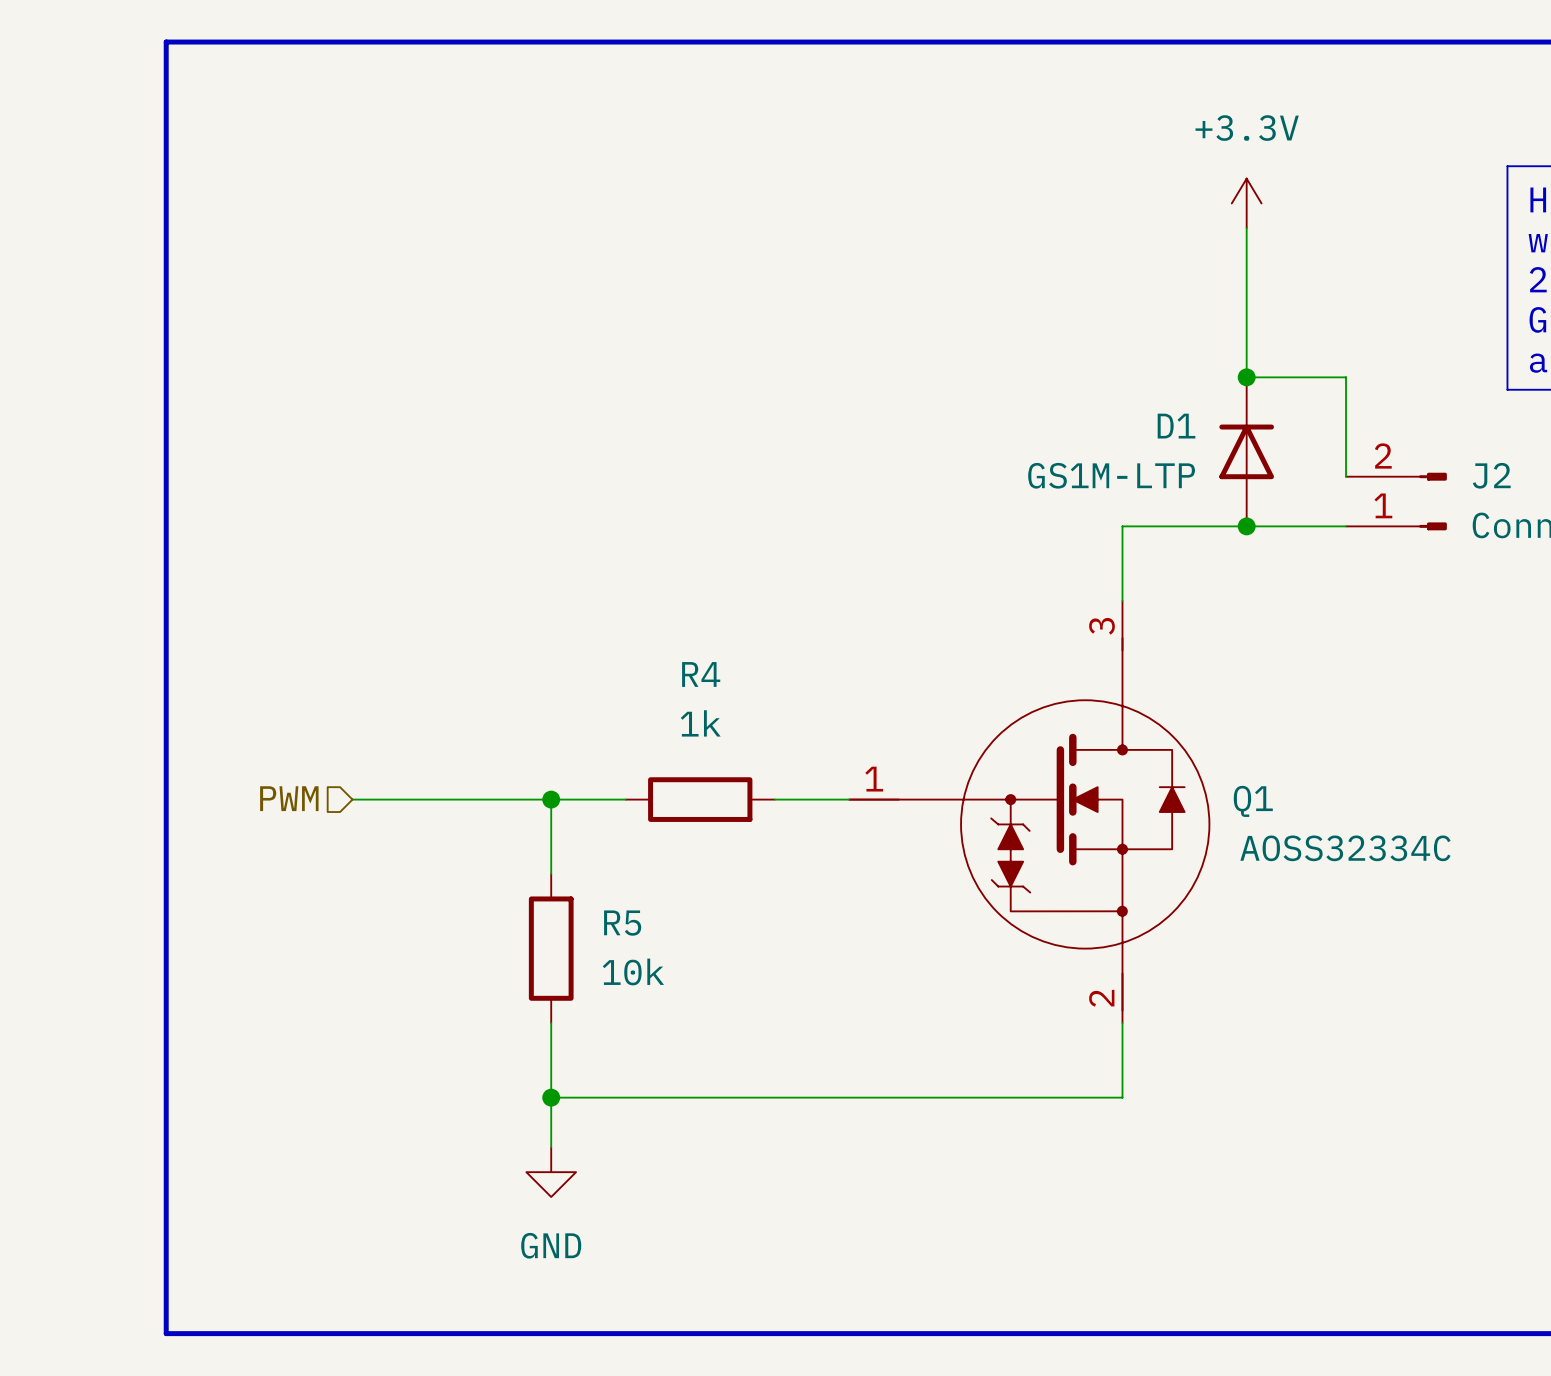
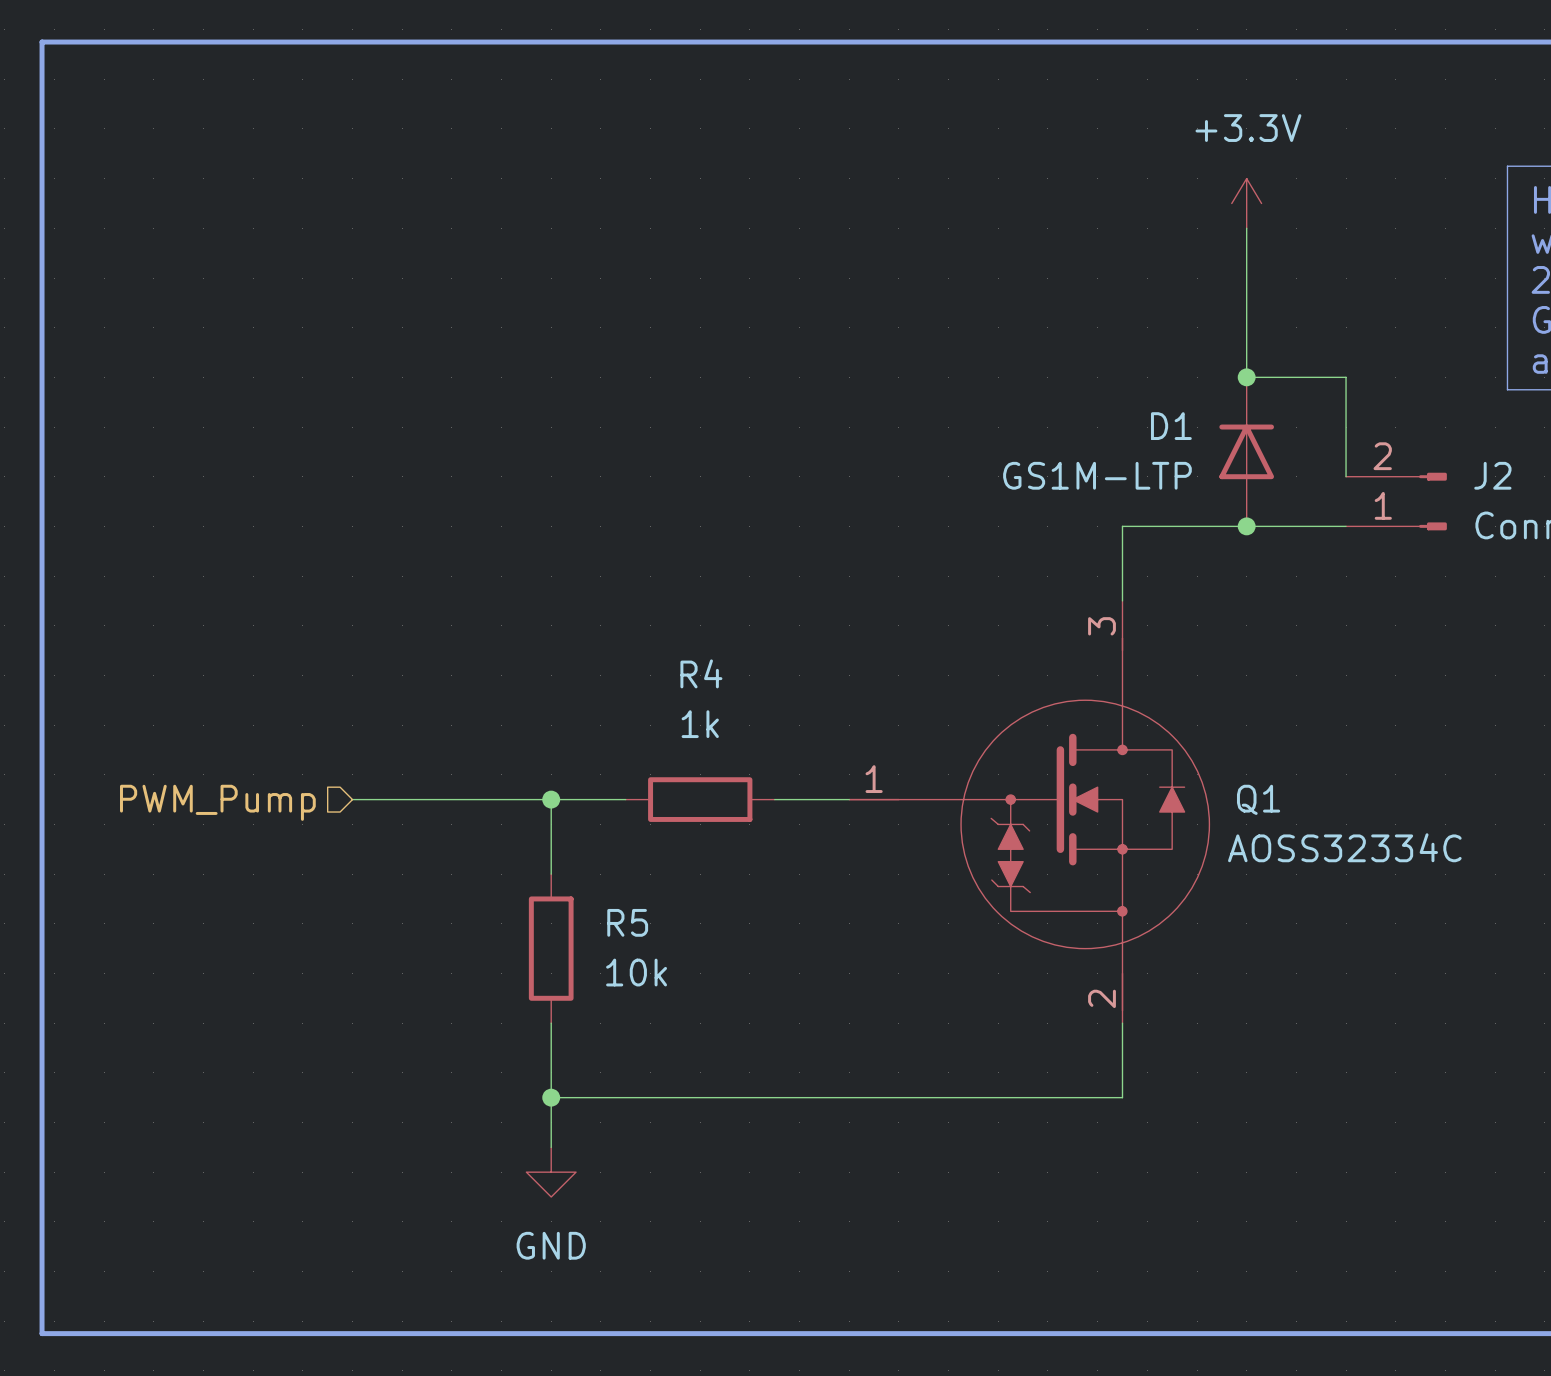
line: (166, 42) (166, 1333) -> (166, 42) (42, 42) (42, 1333) (166, 1333)
hierarchical label: PWM (289, 798) -> PWM_Pump (217, 802)

